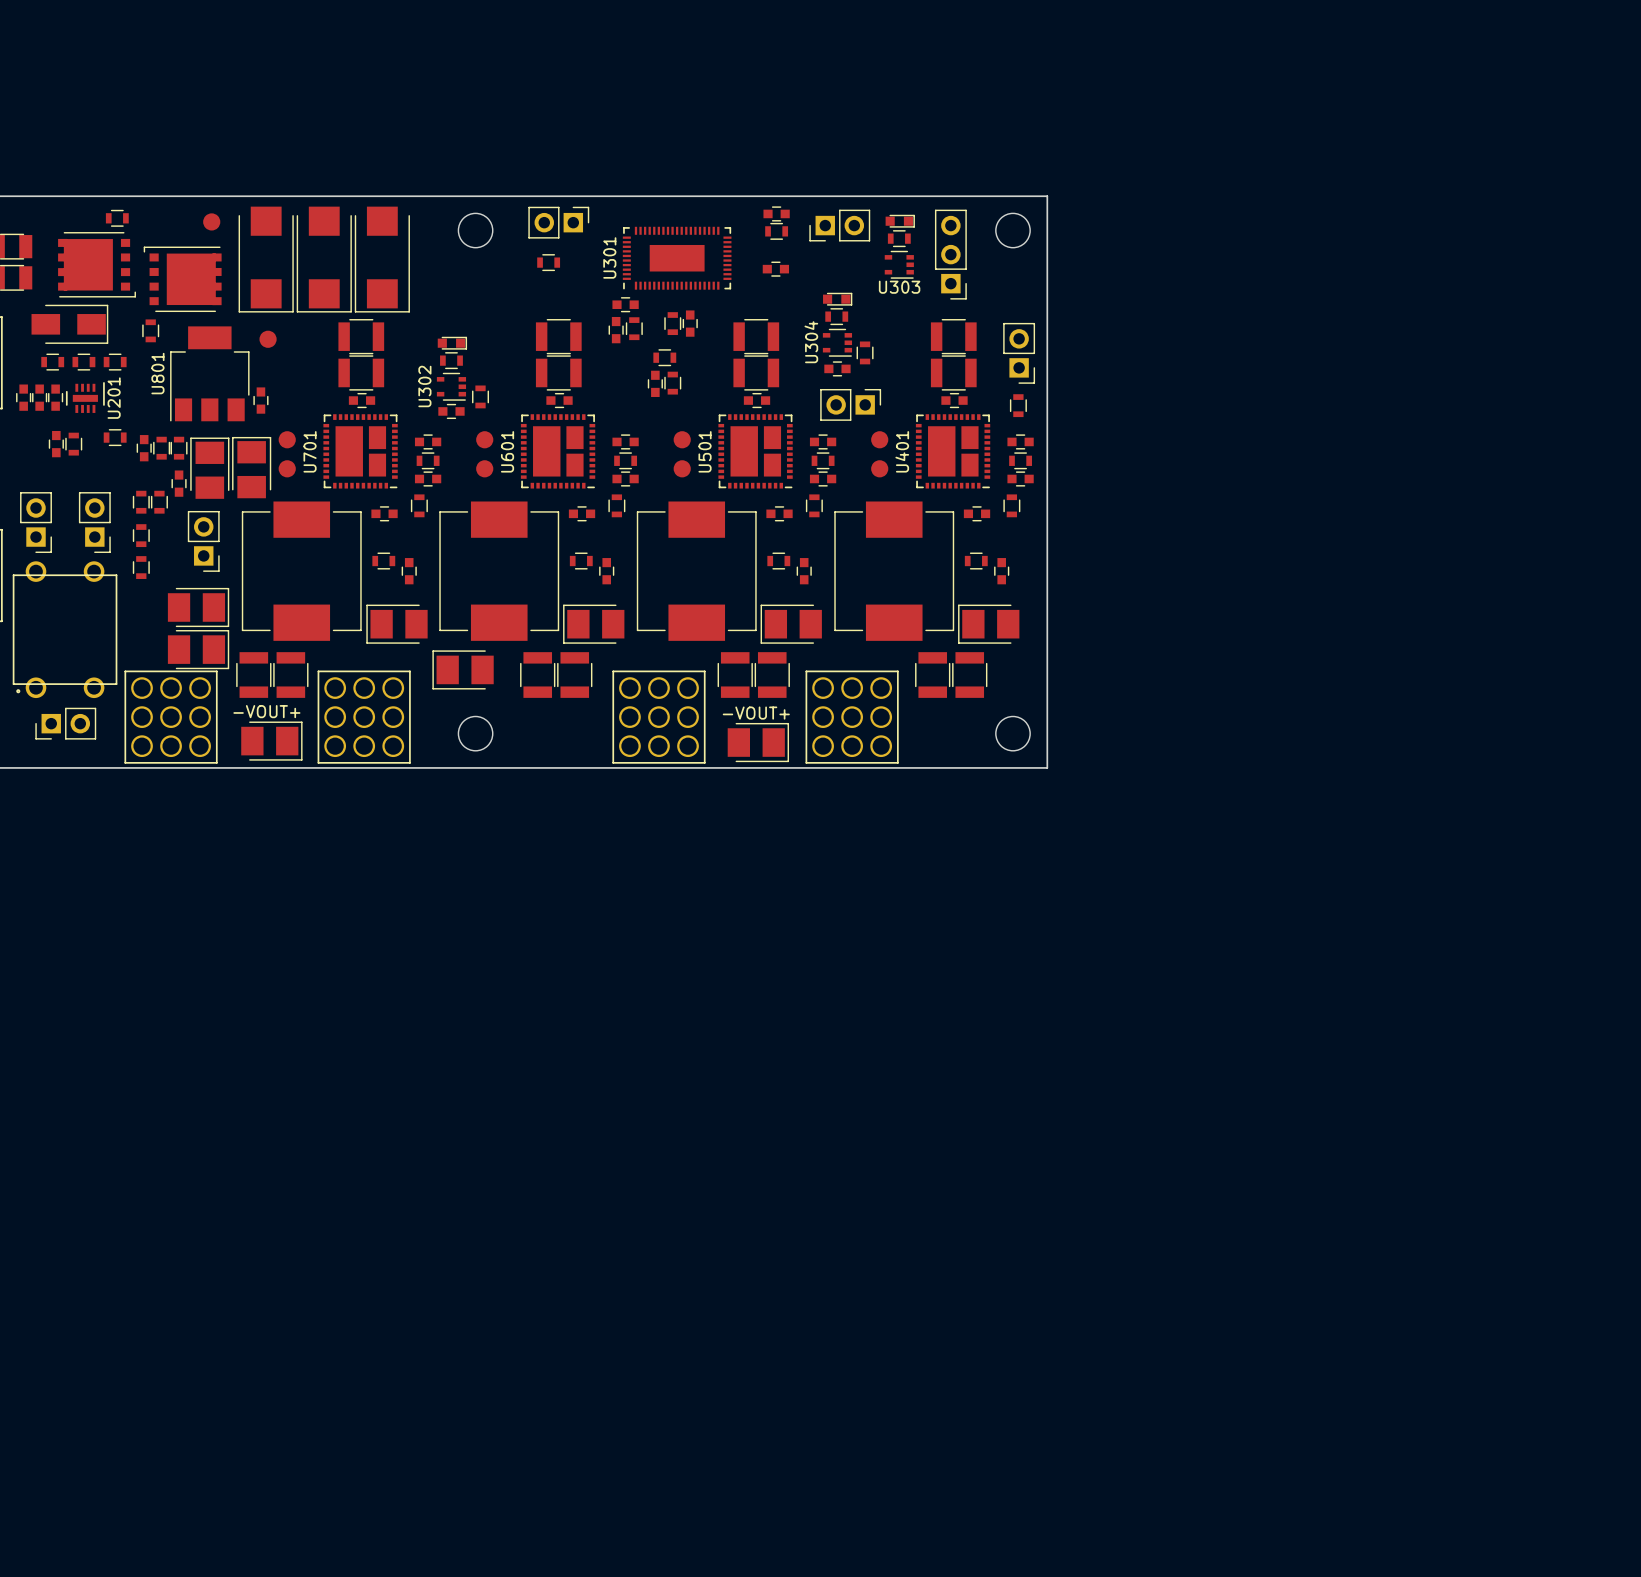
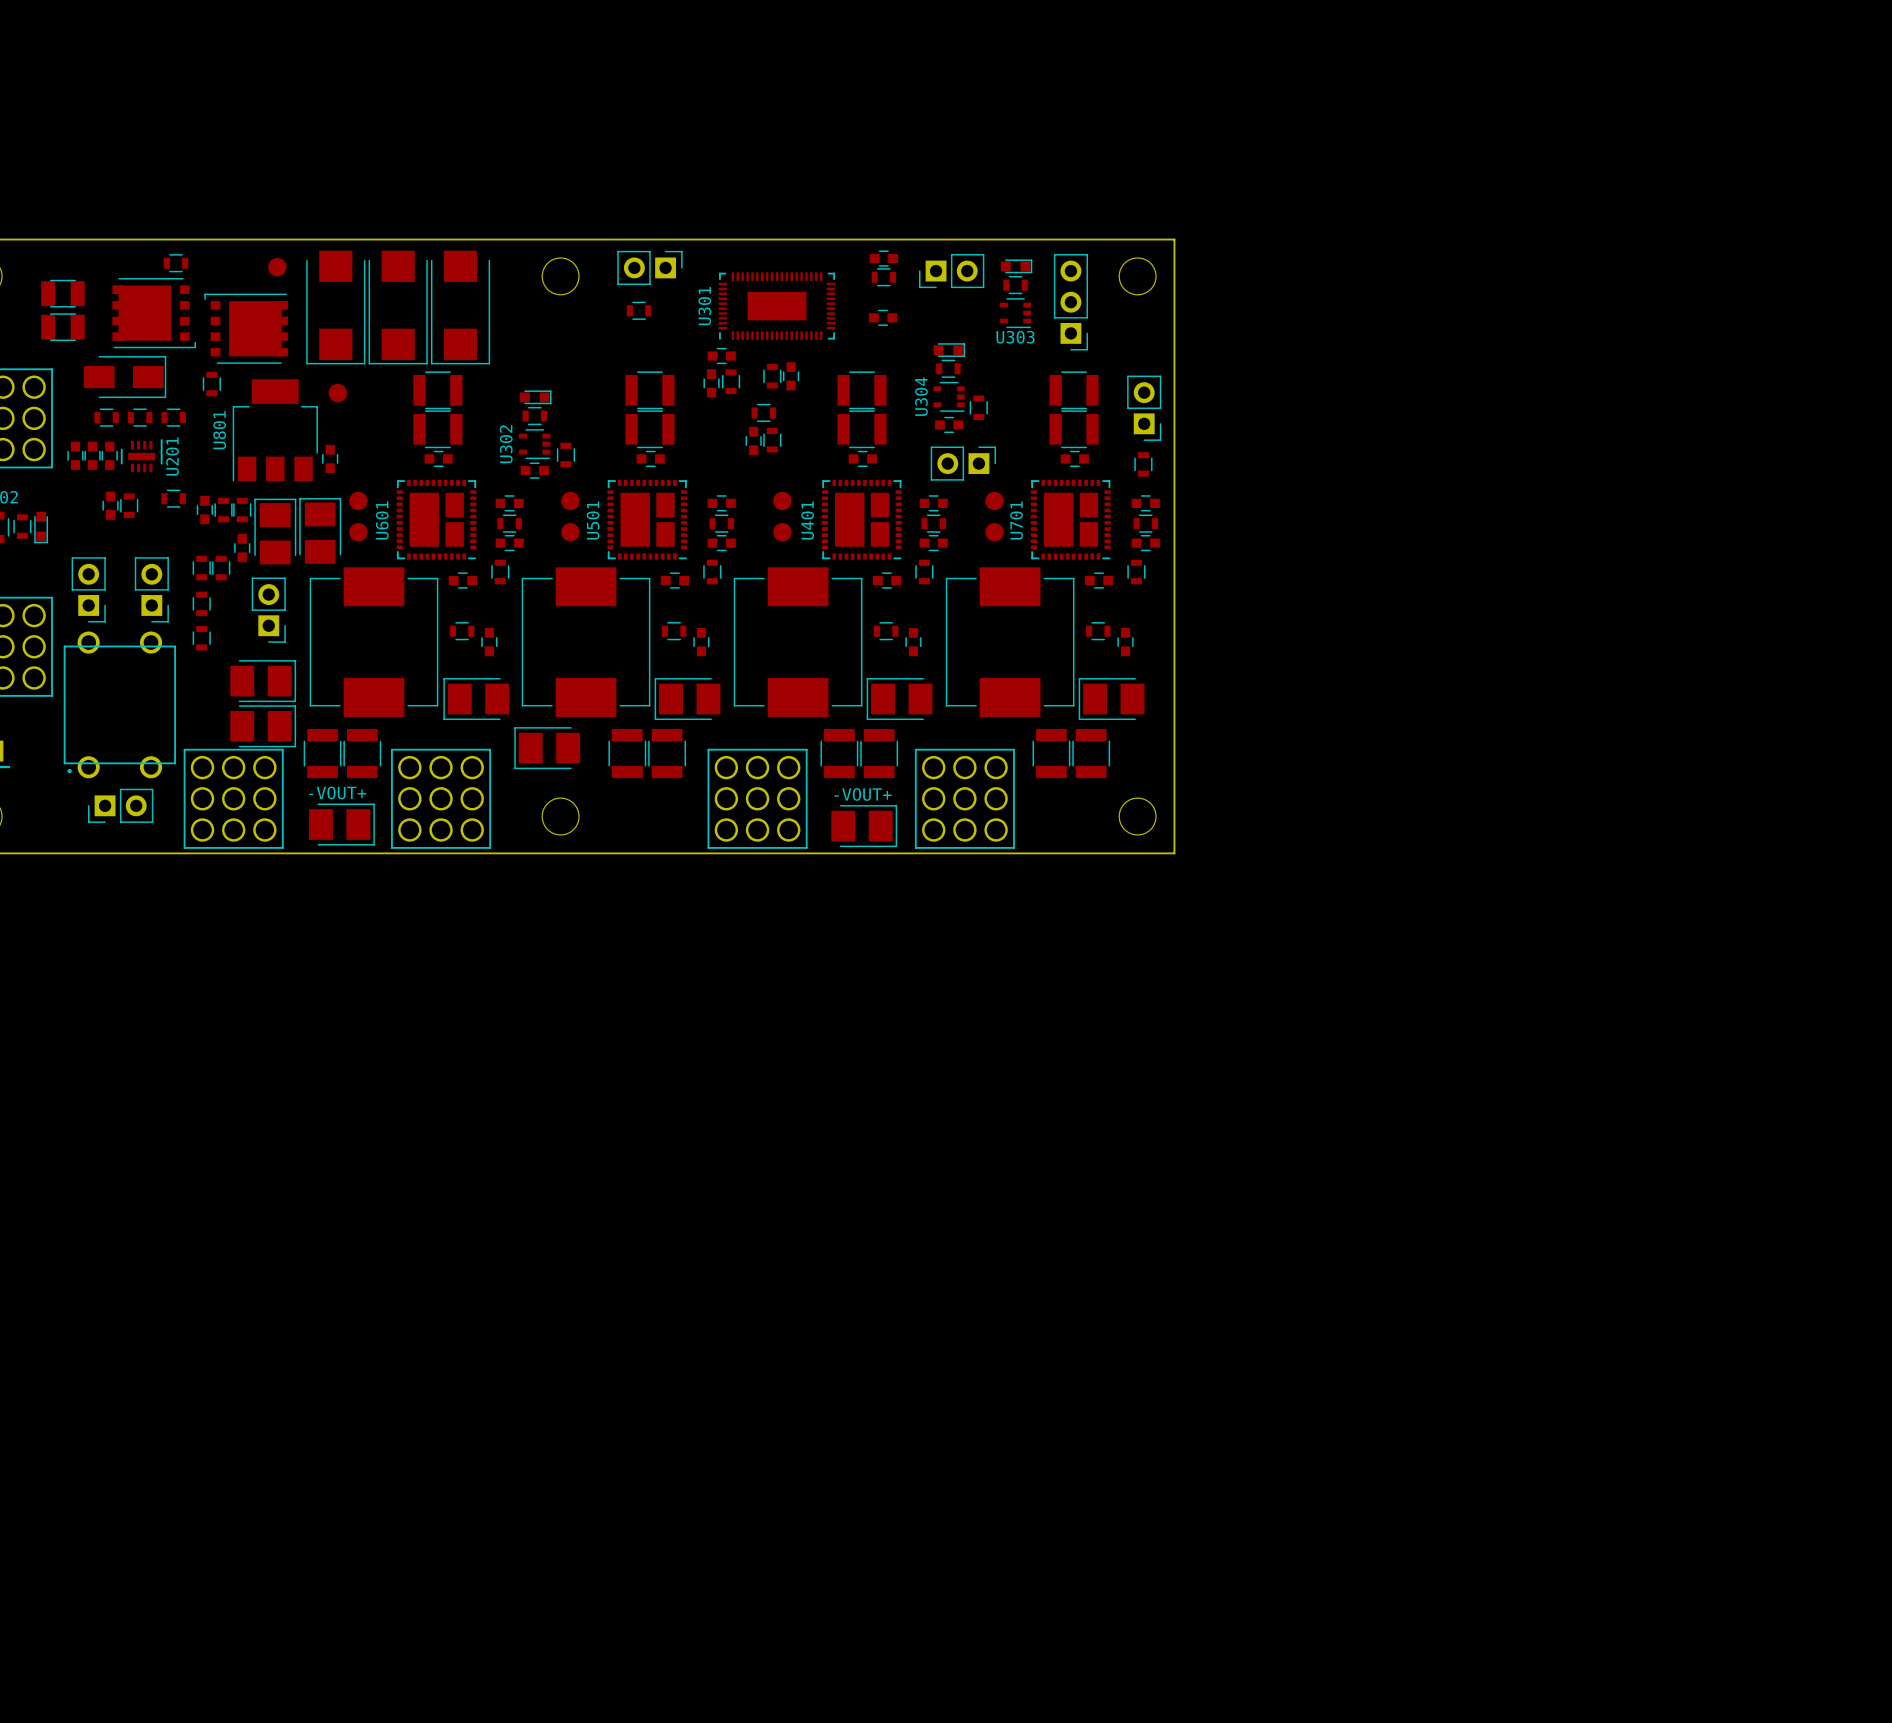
U701 position: (360, 451) -> (1070, 519)
U601 position: (558, 451) -> (436, 519)
U501 position: (755, 451) -> (647, 519)
U401 position: (953, 451) -> (861, 519)

